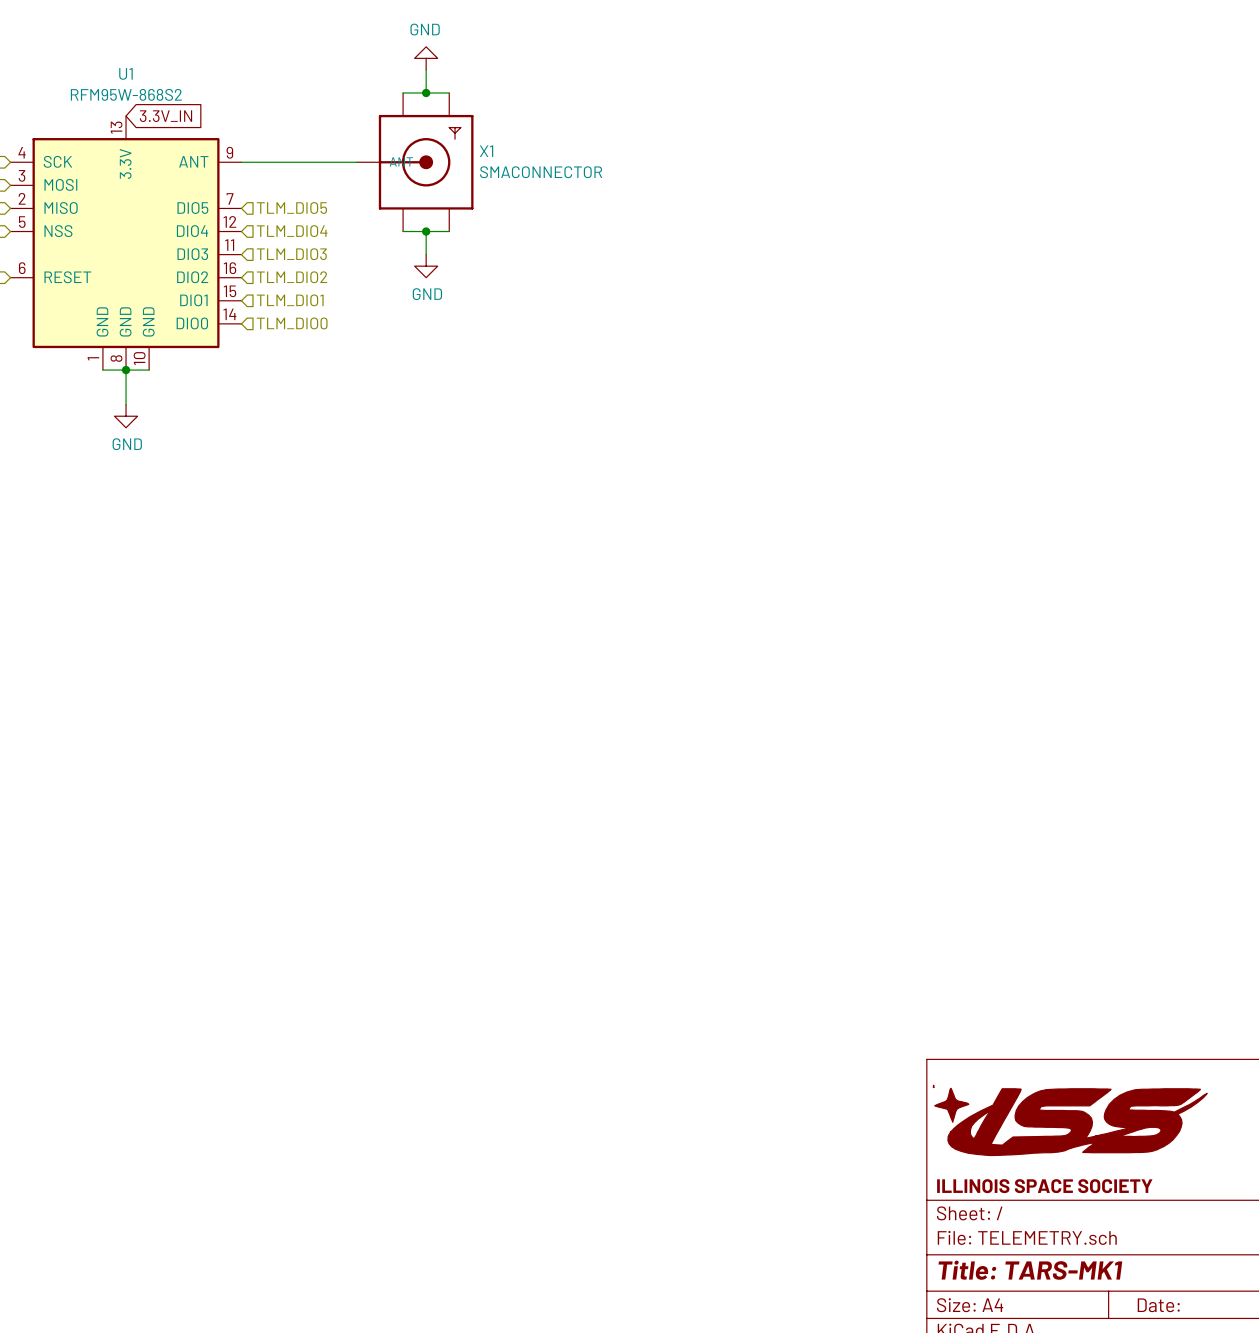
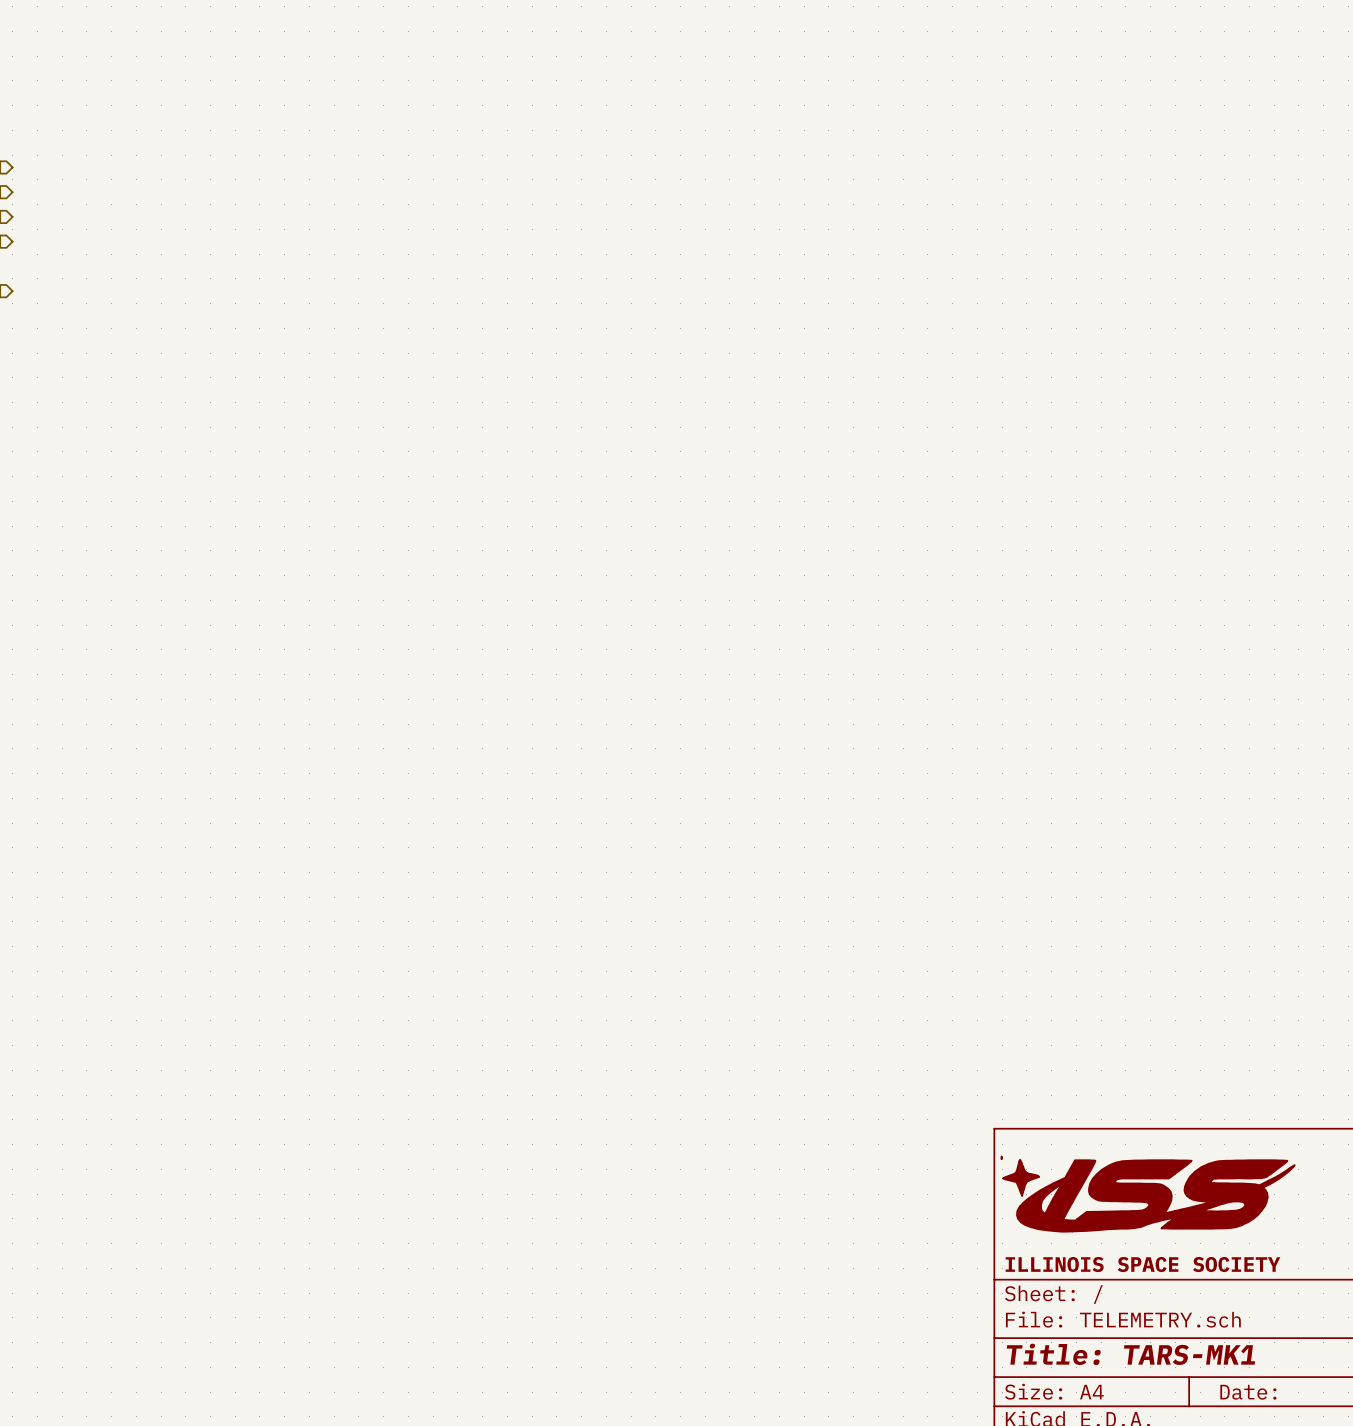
power symbol: GND (426, 58) -> none
wire: (426, 69) (426, 93) -> none
wire: (403, 93) (449, 93) -> none
junction: (426, 93) -> none
global label: 3.3V_IN (165, 116) -> none
wire: (241, 162) (356, 162) -> none
X1: SMACONNECTOR (415, 162) -> none
hierarchical label: TLM_DIO5 (291, 208) -> none
hierarchical label: TLM_DIO4 (292, 231) -> none
wire: (403, 231) (449, 231) -> none
wire: (426, 231) (426, 254) -> none
junction: (426, 231) -> none
U1: RFM95W-868S2 (126, 243) -> none
hierarchical label: TLM_DIO3 (291, 254) -> none
power symbol: GND (426, 266) -> none
hierarchical label: TLM_DIO2 (292, 277) -> none
hierarchical label: TLM_DIO1 (290, 300) -> none
hierarchical label: TLM_DIO0 (292, 323) -> none
wire: (102, 370) (149, 370) -> none
wire: (126, 370) (126, 404) -> none
junction: (126, 370) -> none
power symbol: GND (126, 416) -> none

